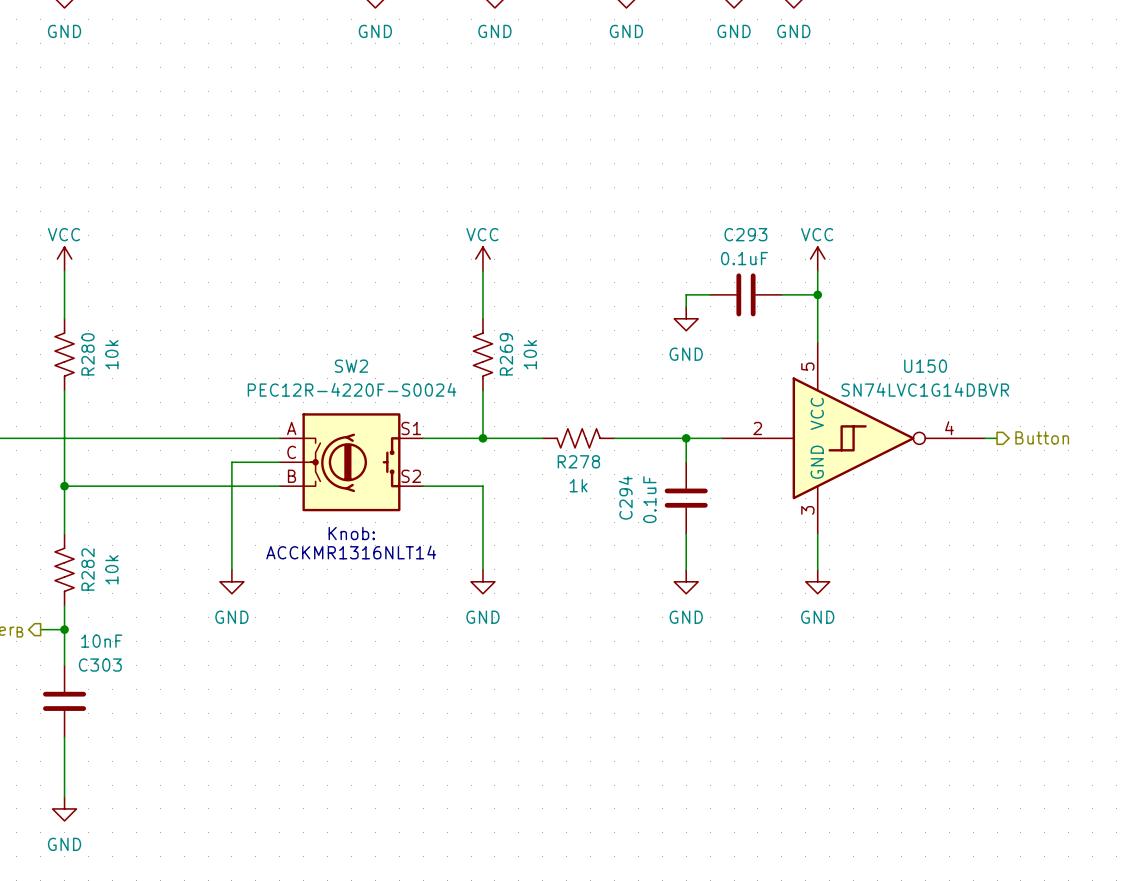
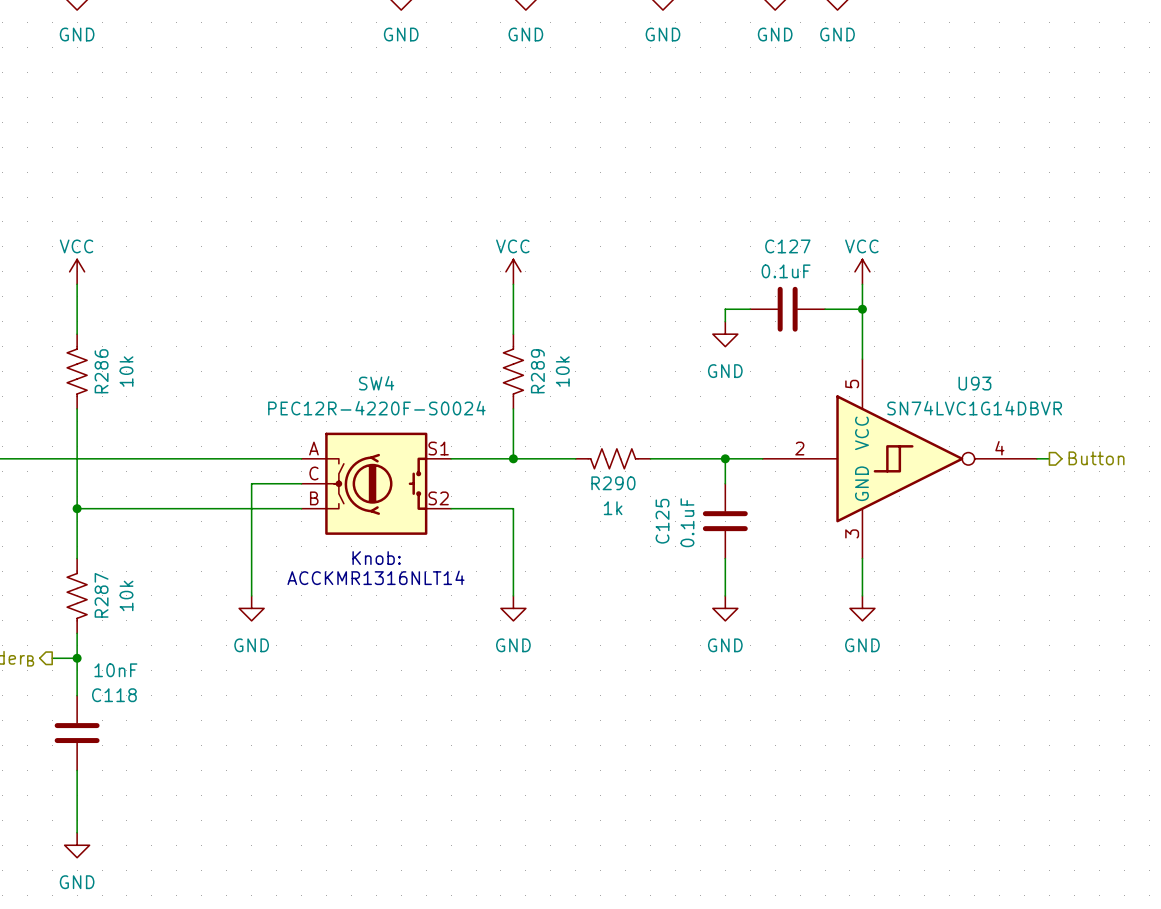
C293 name: C293 (745, 234) -> C127 (787, 246)
R280 name: R280 (88, 354) -> R286 (101, 371)
R269 name: R269 (506, 354) -> R289 (537, 371)
SW2 name: SW2 (351, 366) -> SW4 (376, 383)
U150 name: U150 (925, 366) -> U93 (974, 383)
R278 name: R278 (578, 461) -> R290 (613, 483)
C294 name: C294 (625, 497) -> C125 (662, 521)
R282 name: R282 (88, 569) -> R287 (101, 595)
C303 name: C303 (100, 665) -> C118 (114, 695)

